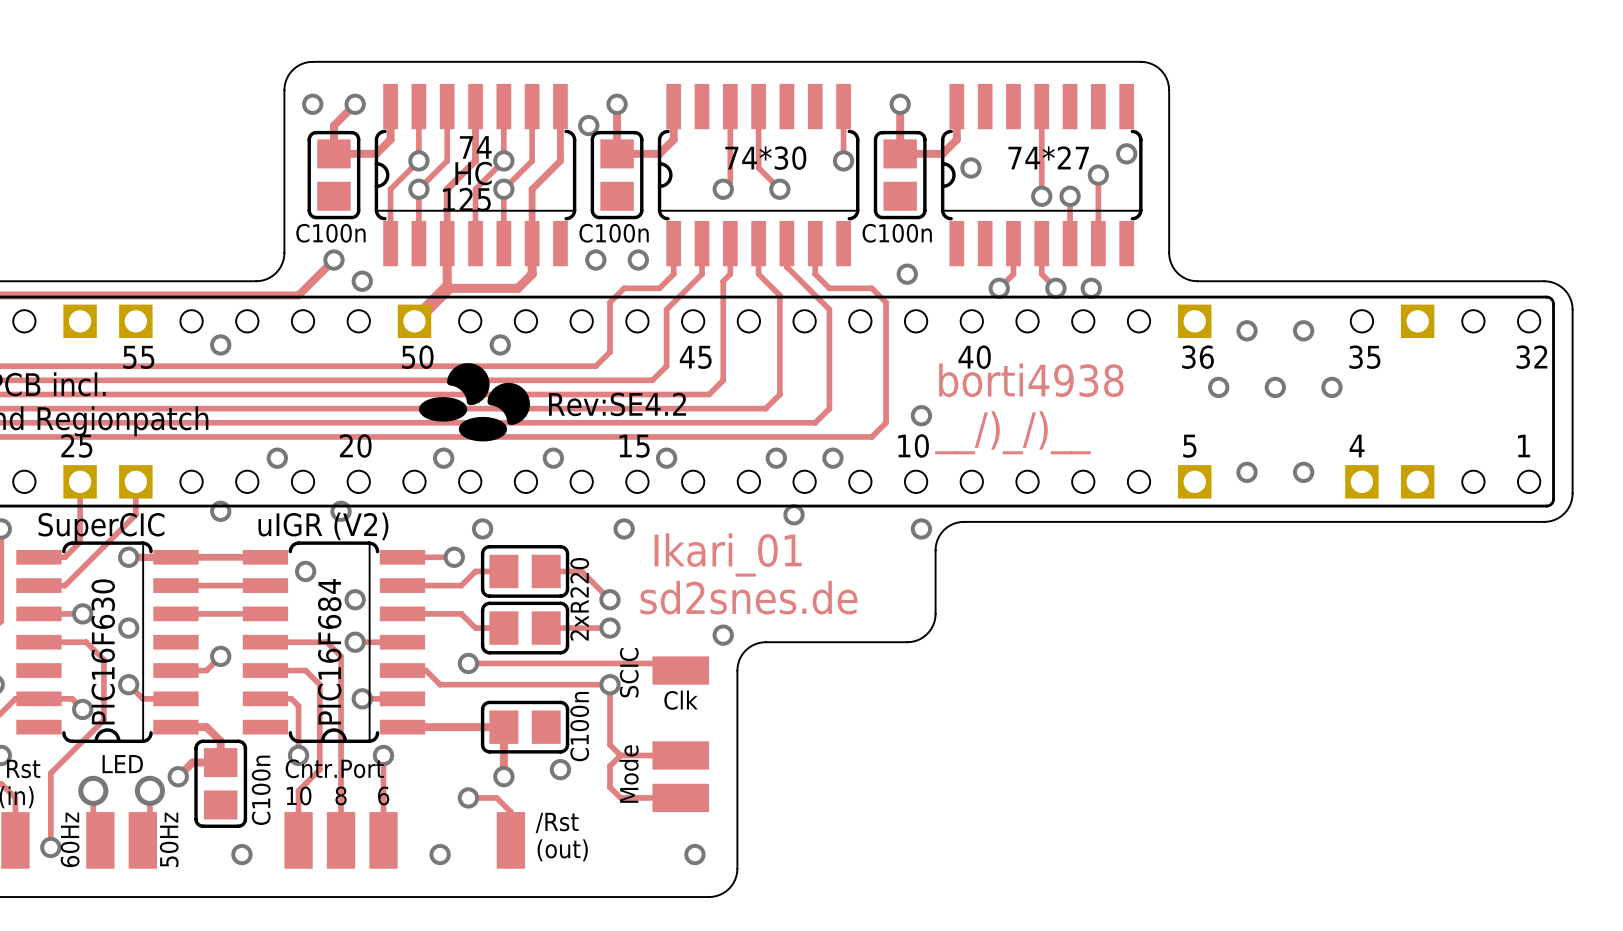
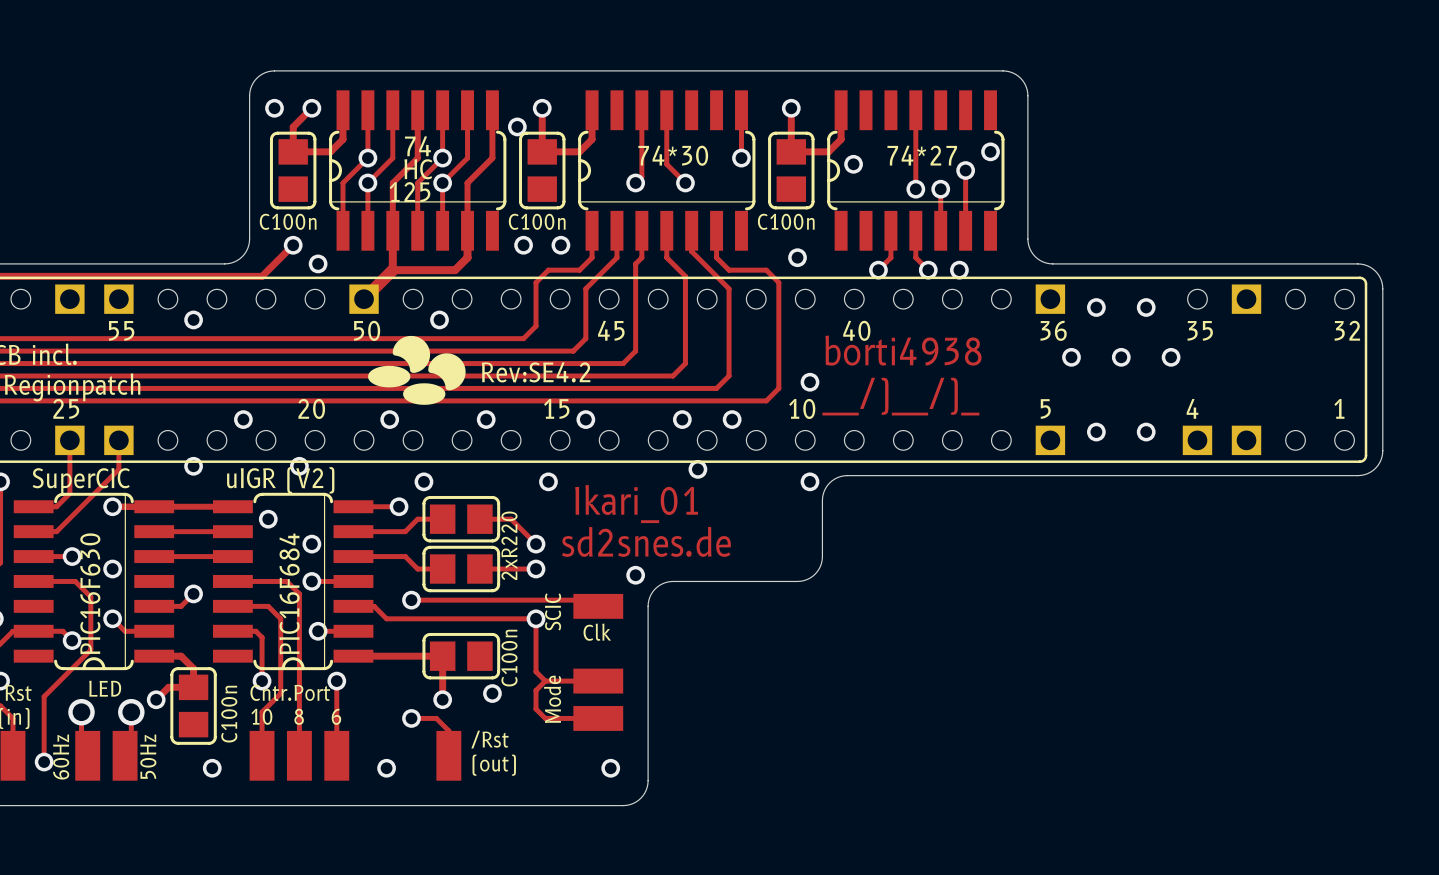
text: __/)_/)__ (1012, 432) -> __/)__/)_ (900, 396)

